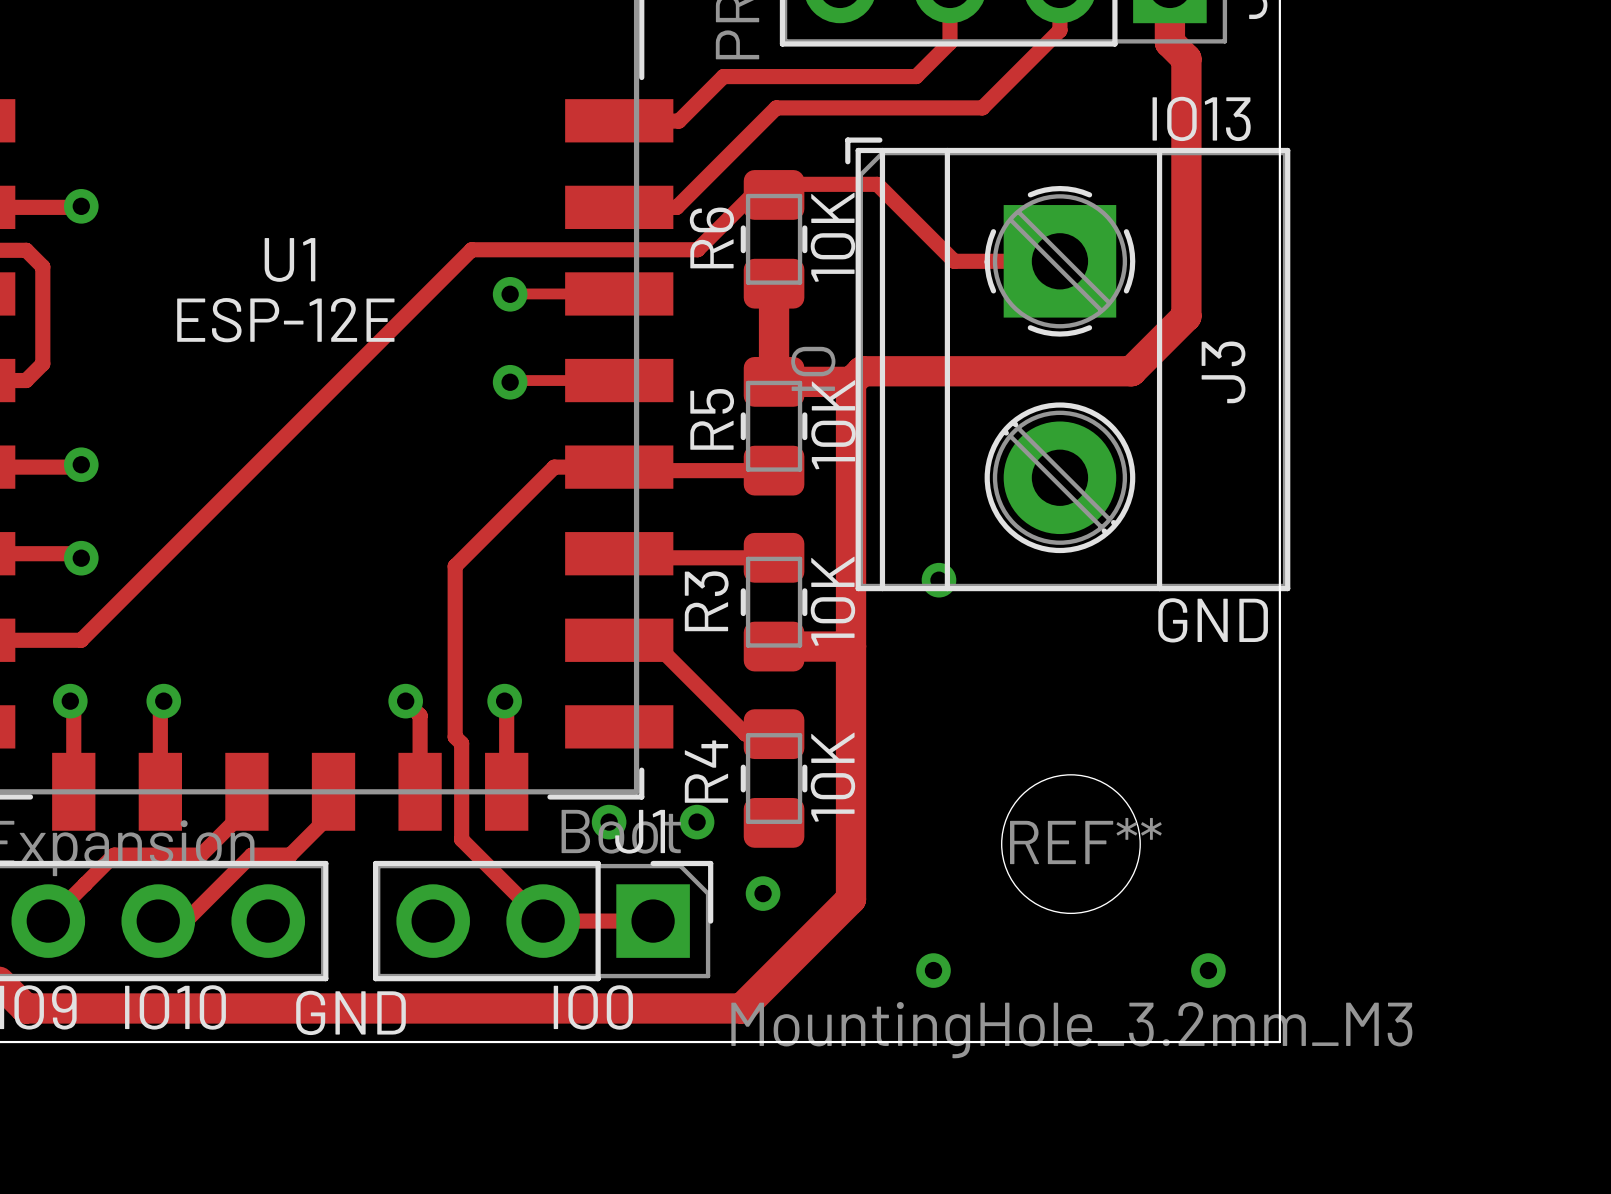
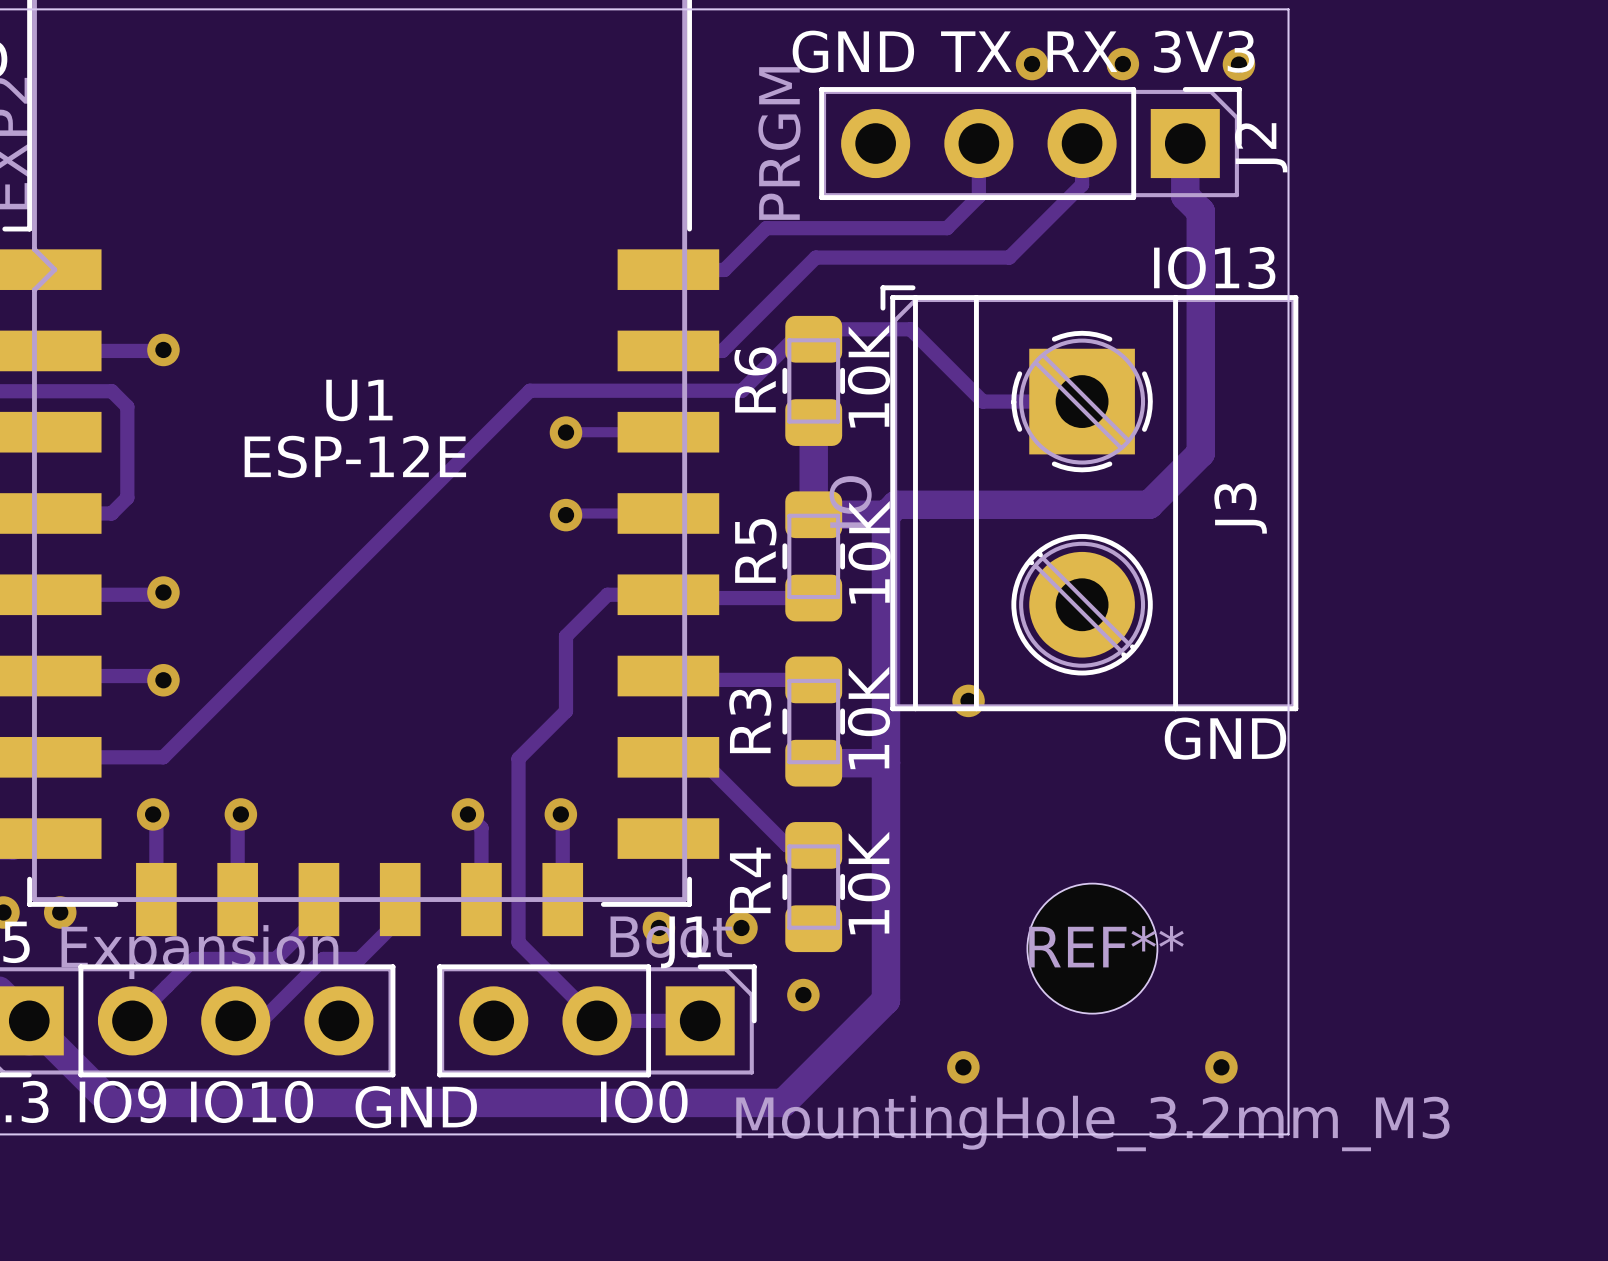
track: (510, 511) (455, 566) (455, 737) (461, 743) (461, 839) -> (566, 636) (566, 711) (518, 758) (518, 942) (520, 944)

